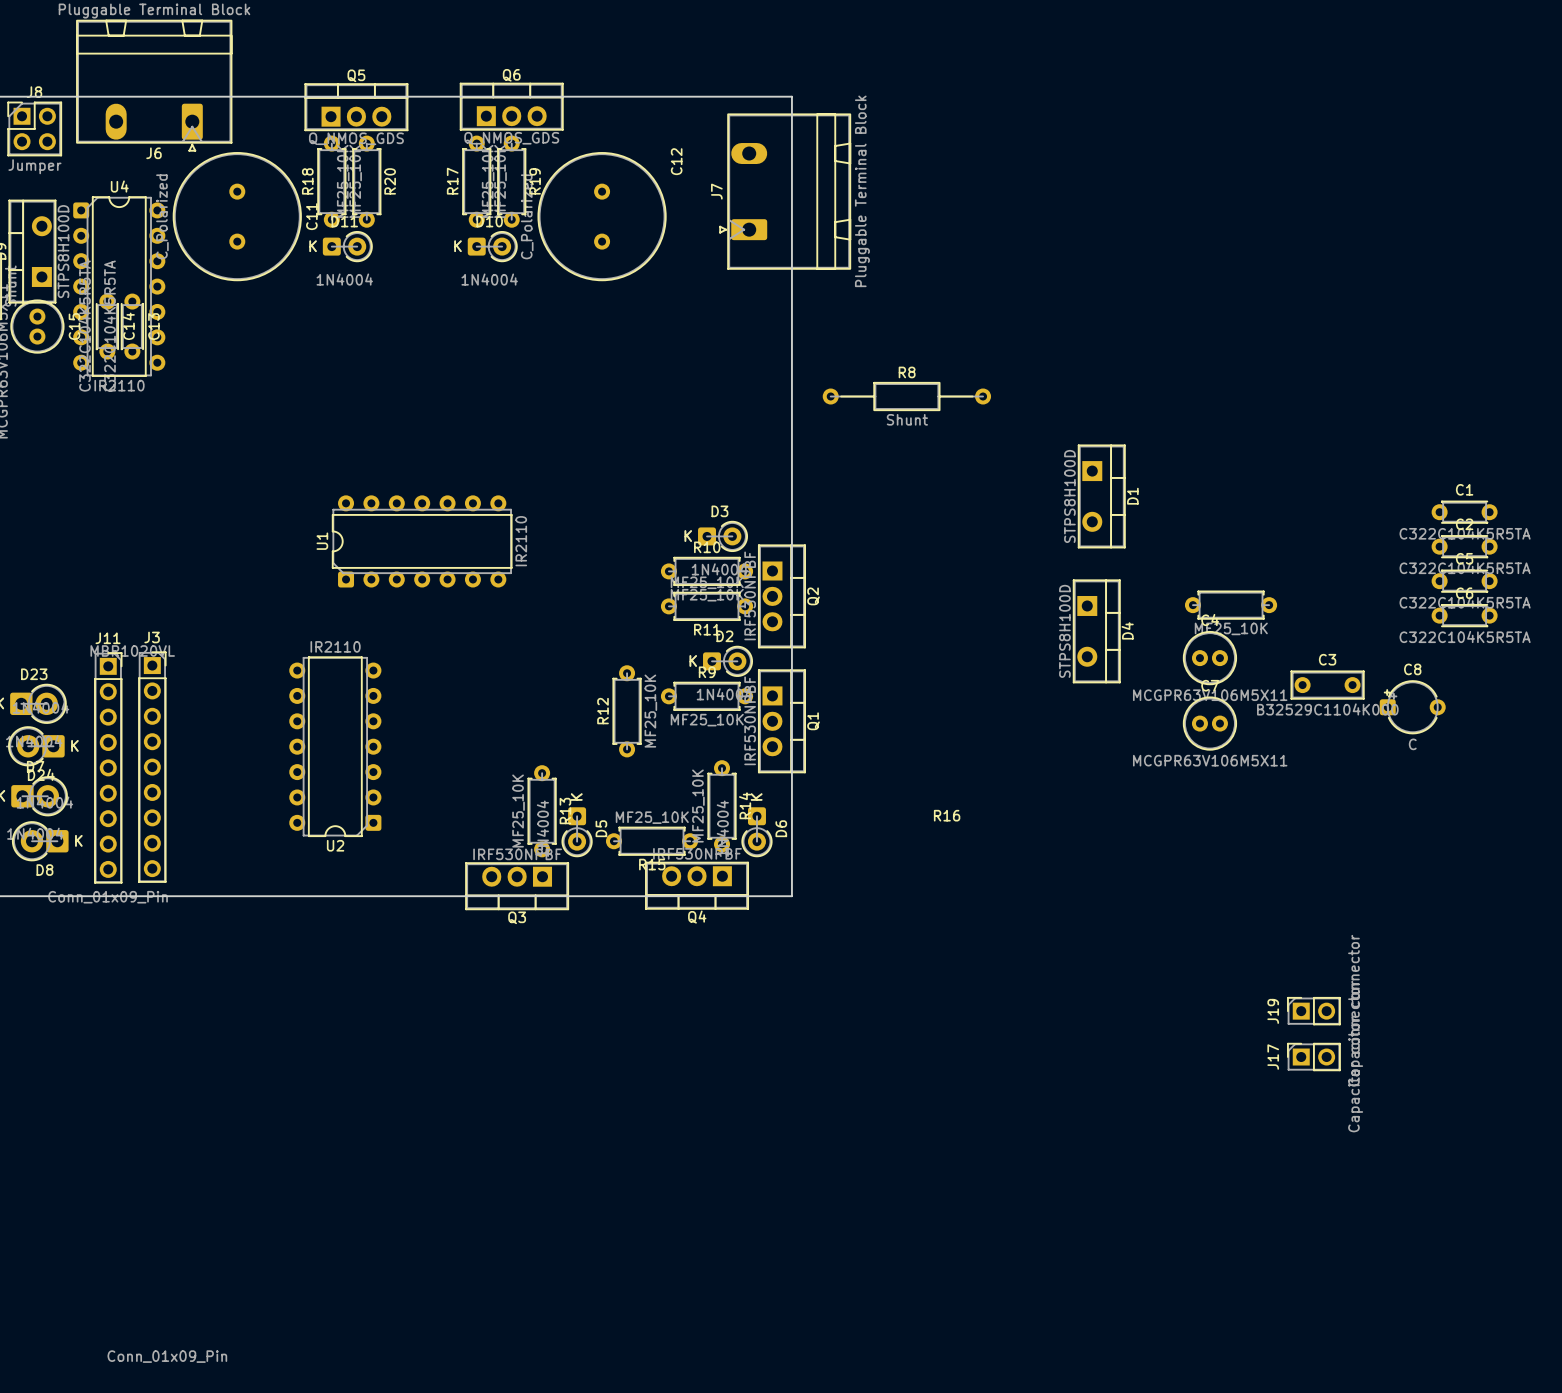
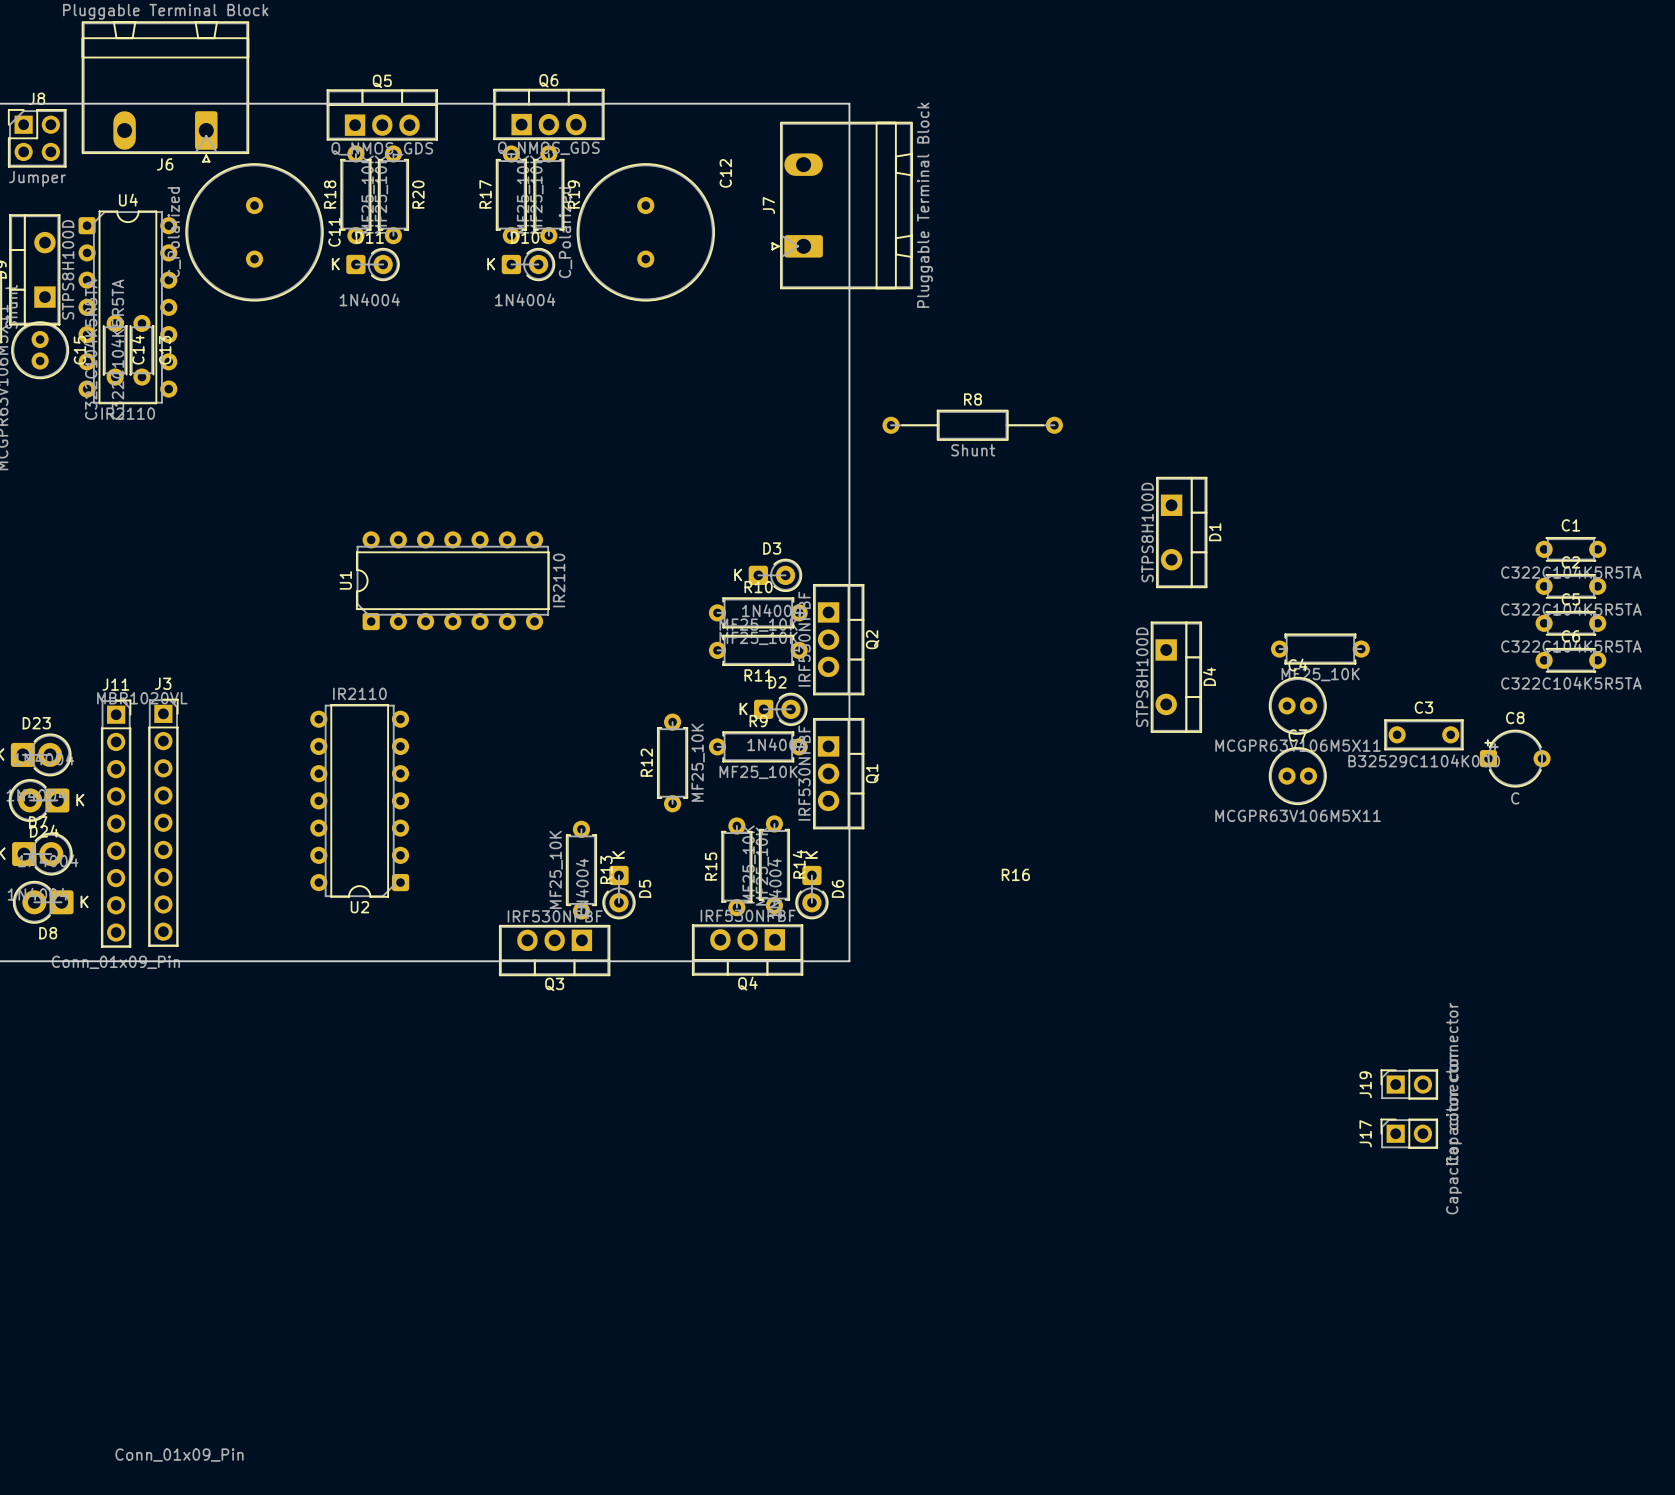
R15 rotation: 0° (652, 841) -> 90° clockwise (736, 866)

